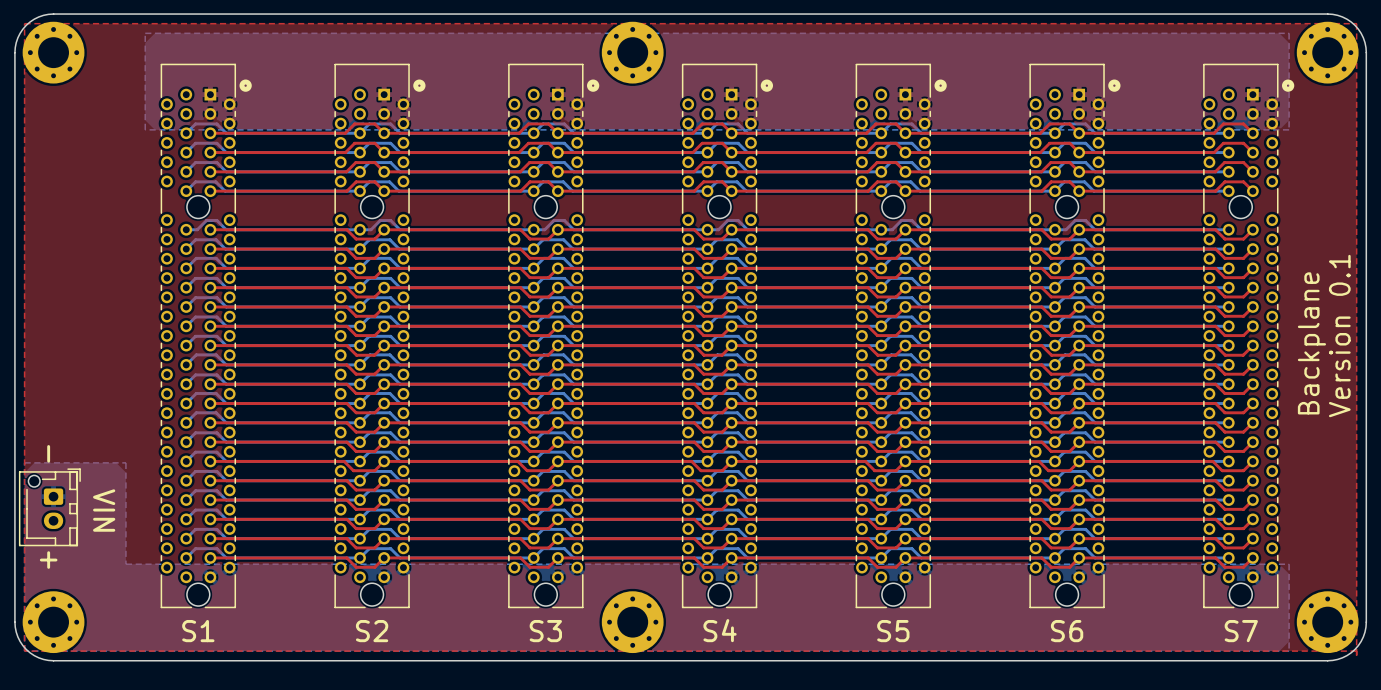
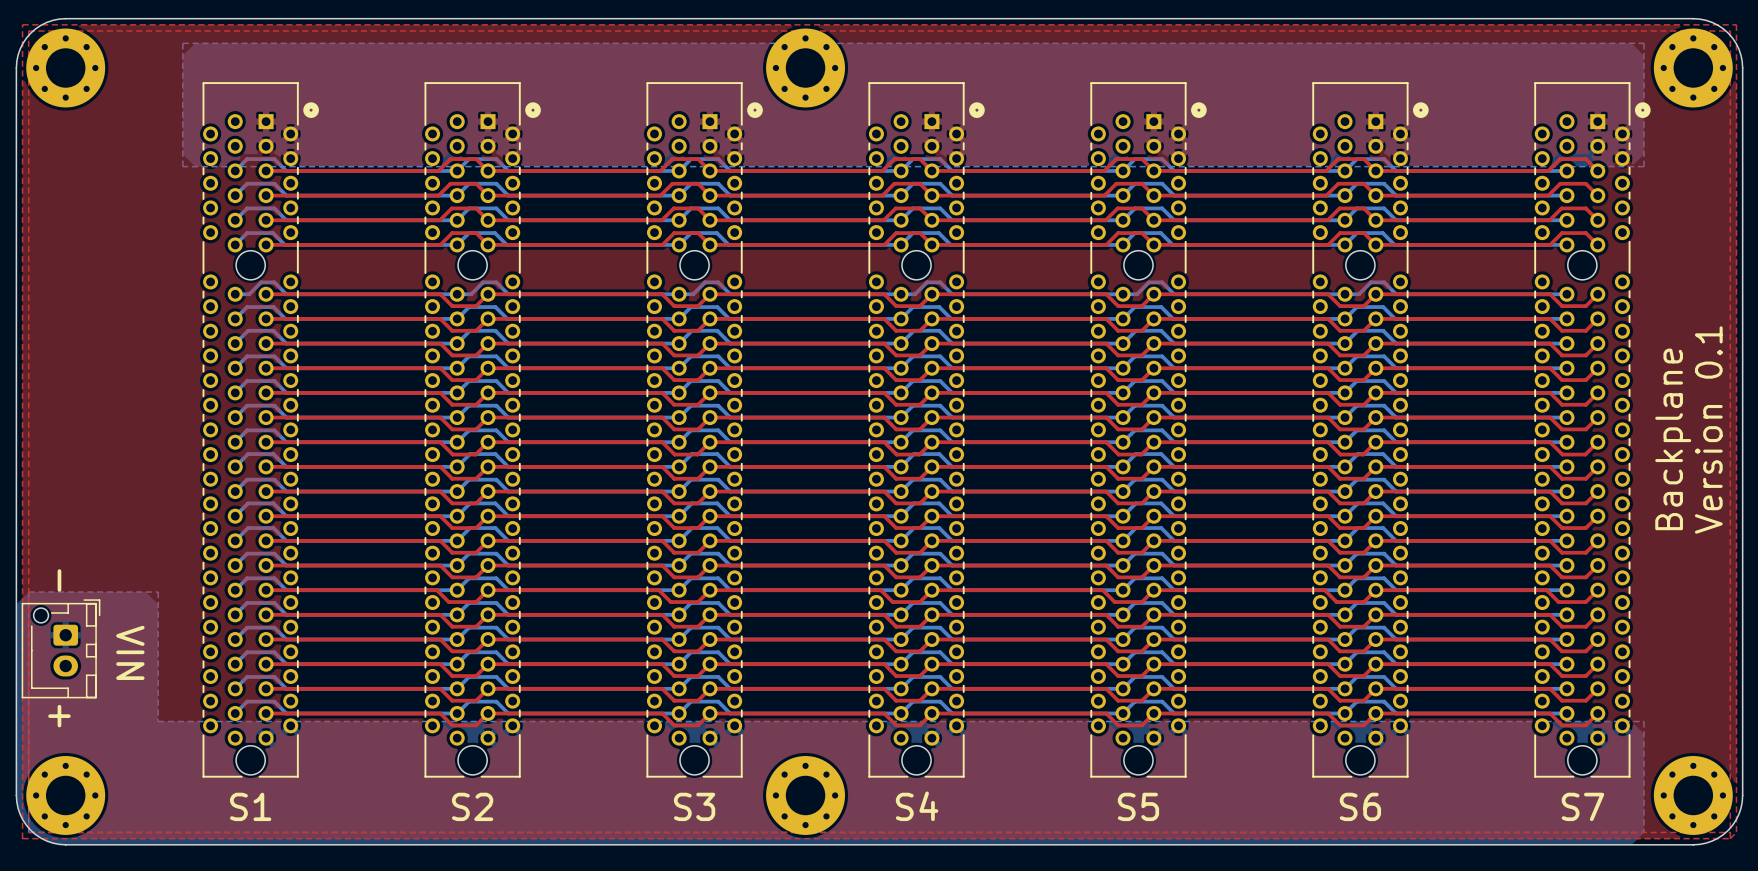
top zone outline: none -> (22, 24) (1736, 24) (1736, 832) (1730, 838) (22, 838) (22, 24)

